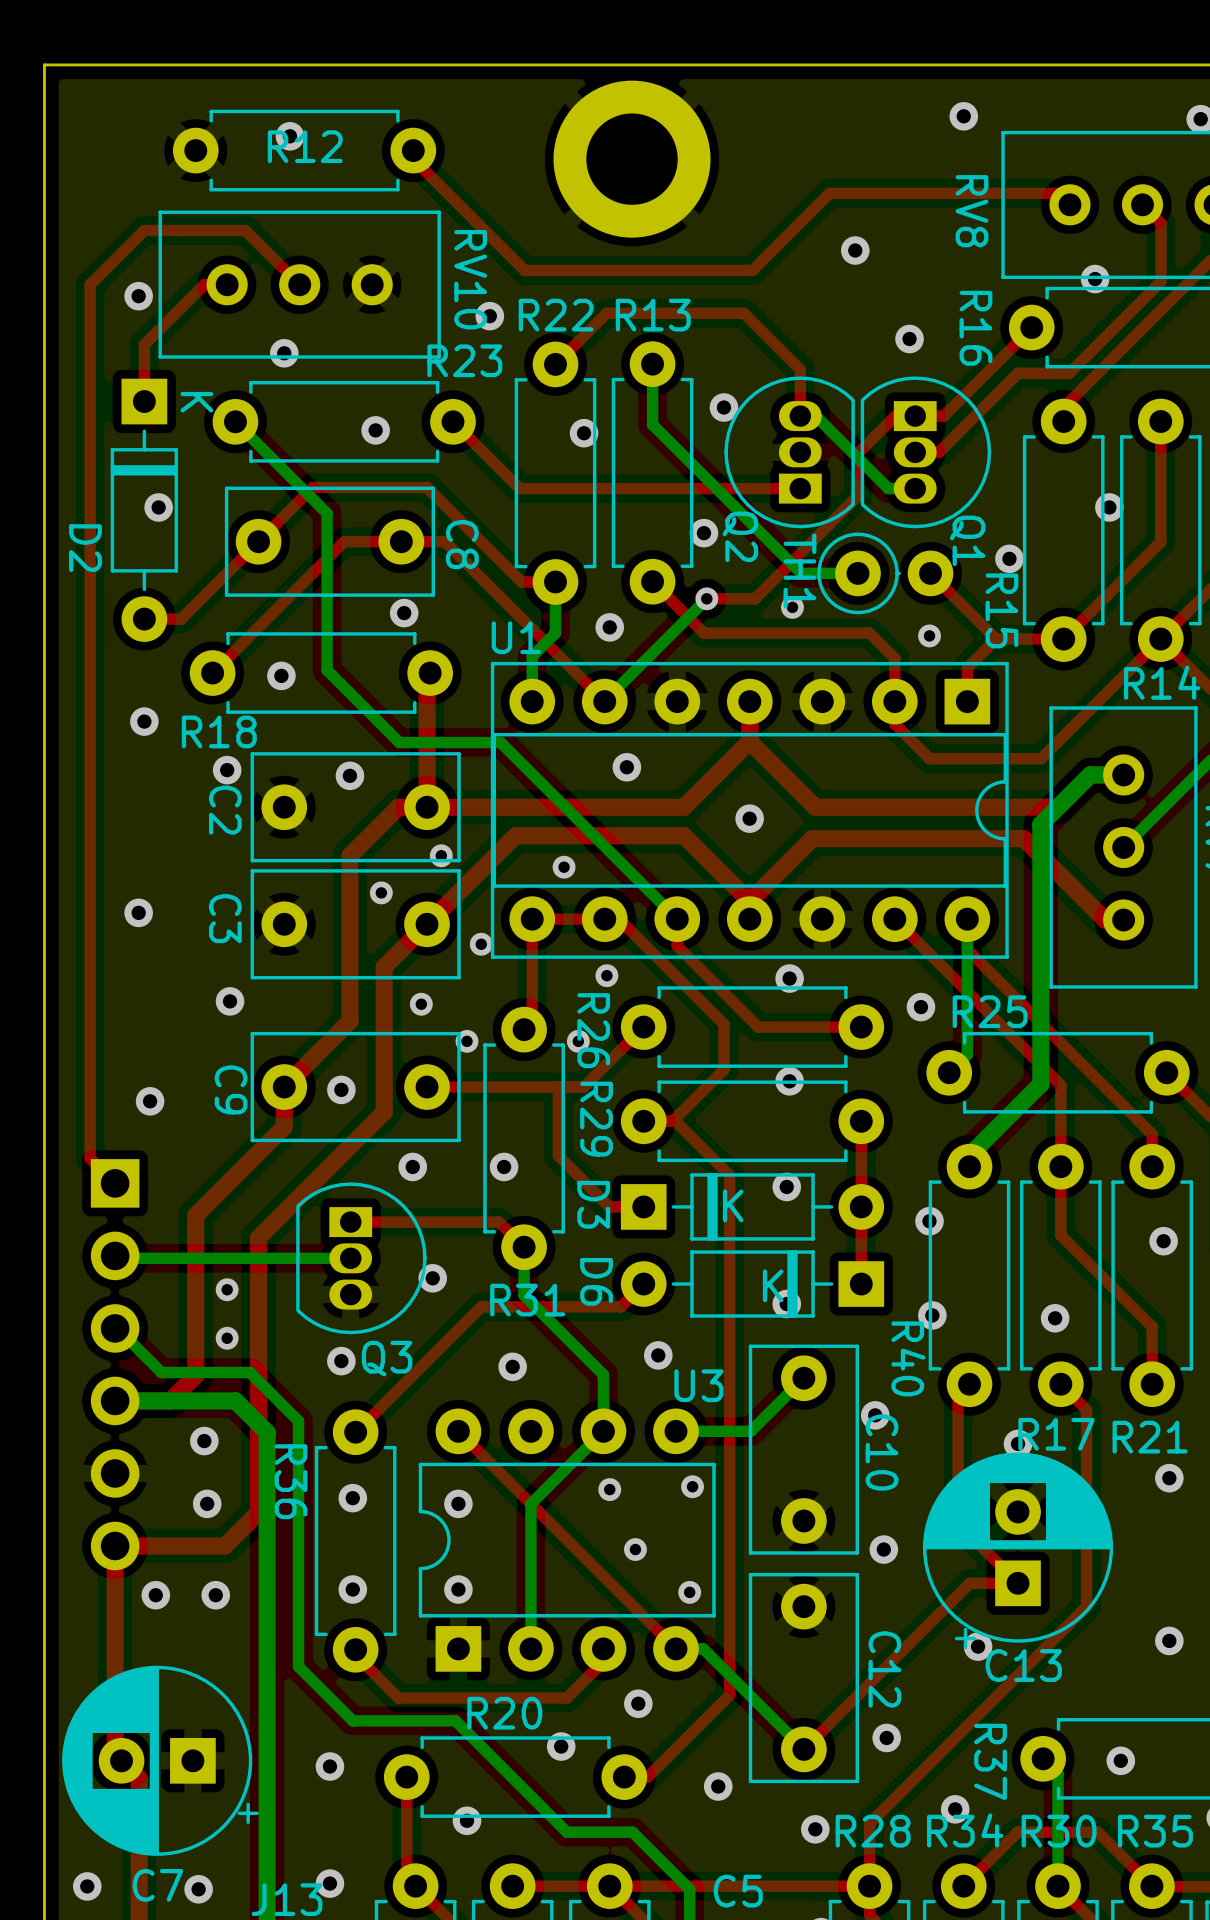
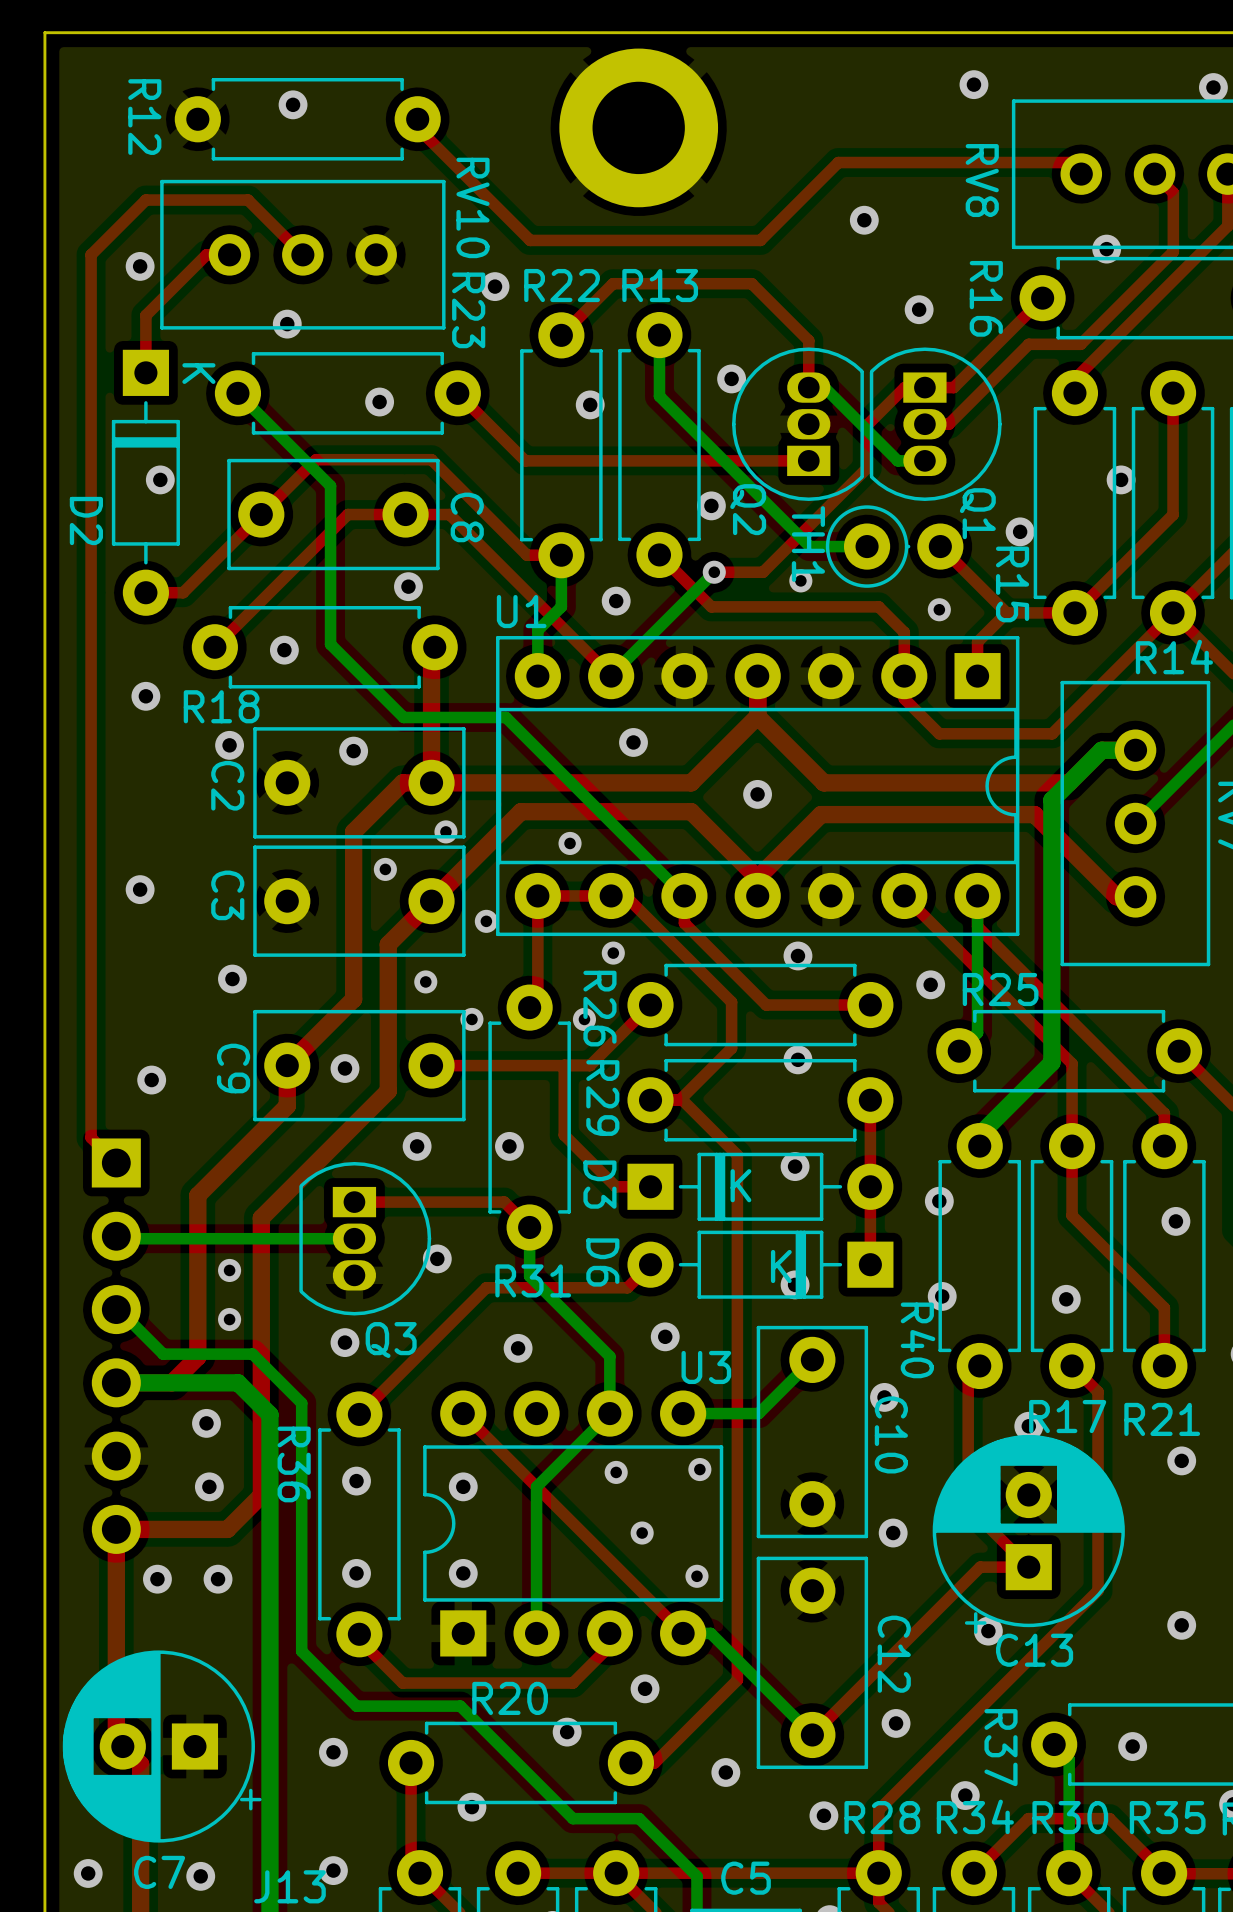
R12 name rotation: 0° (305, 146) -> 90° clockwise (144, 117)
R12 name position: R12 (305, 146) -> R12 (144, 117)
RV10 name position: RV10 (470, 279) -> RV10 (473, 207)
R23 name rotation: 0° (464, 360) -> 90° clockwise (468, 310)

